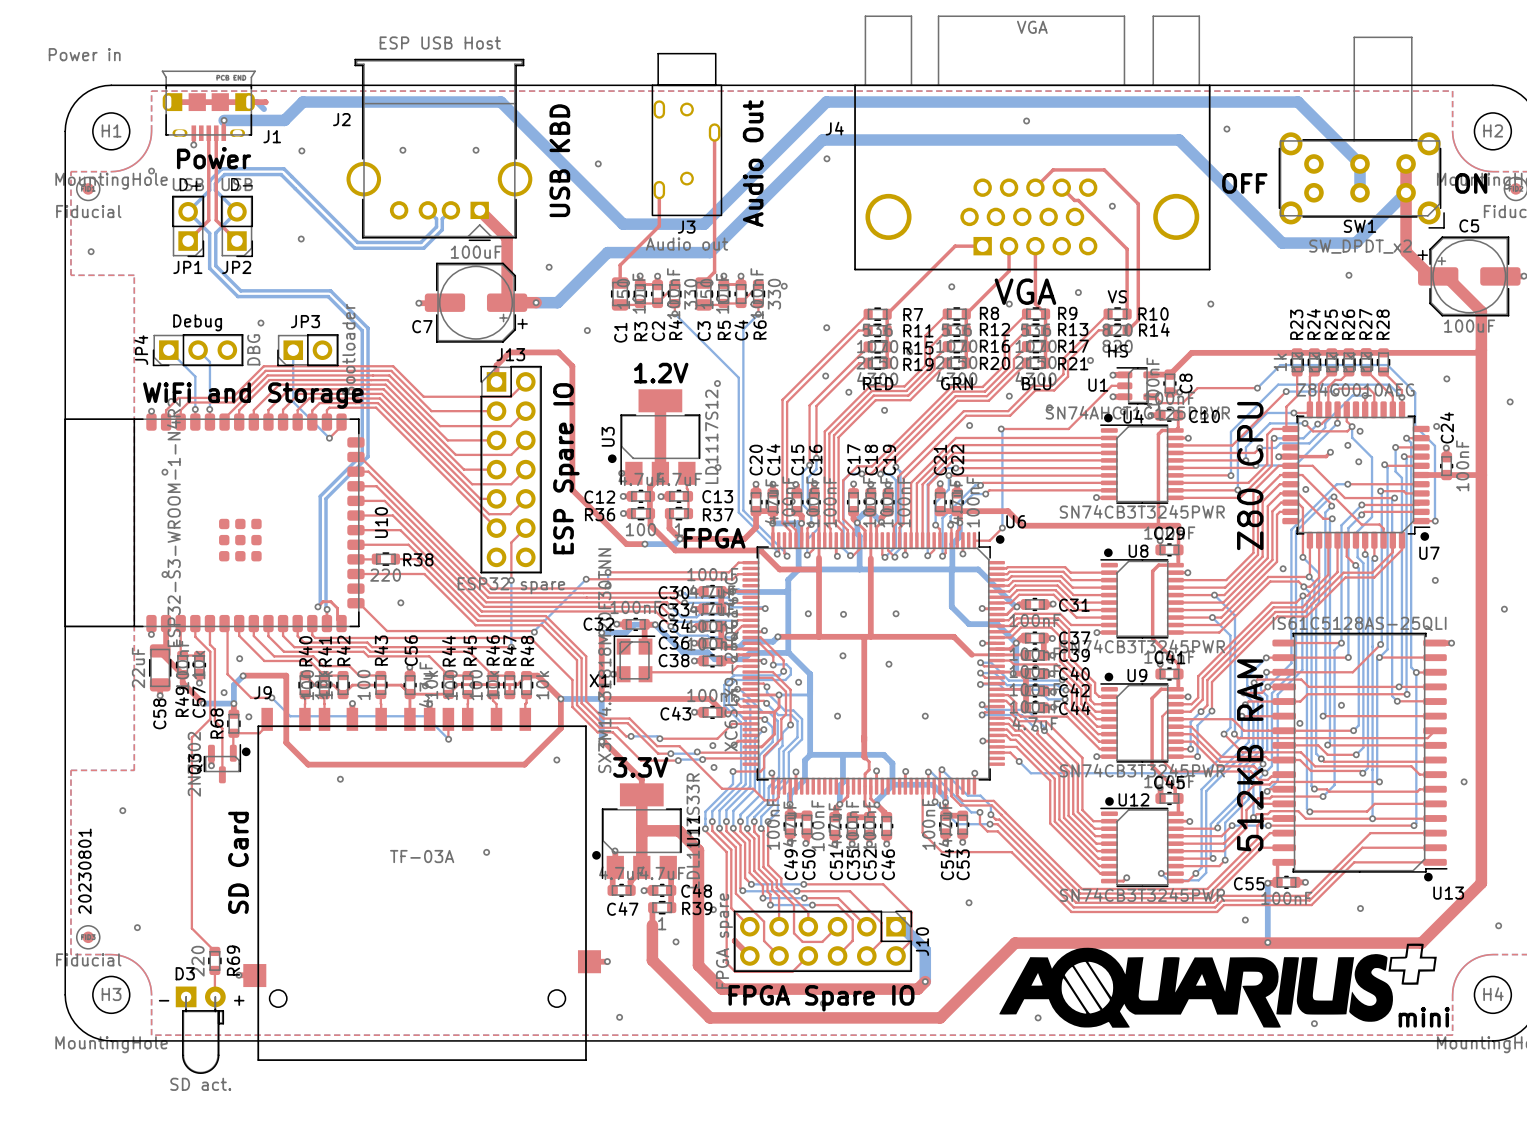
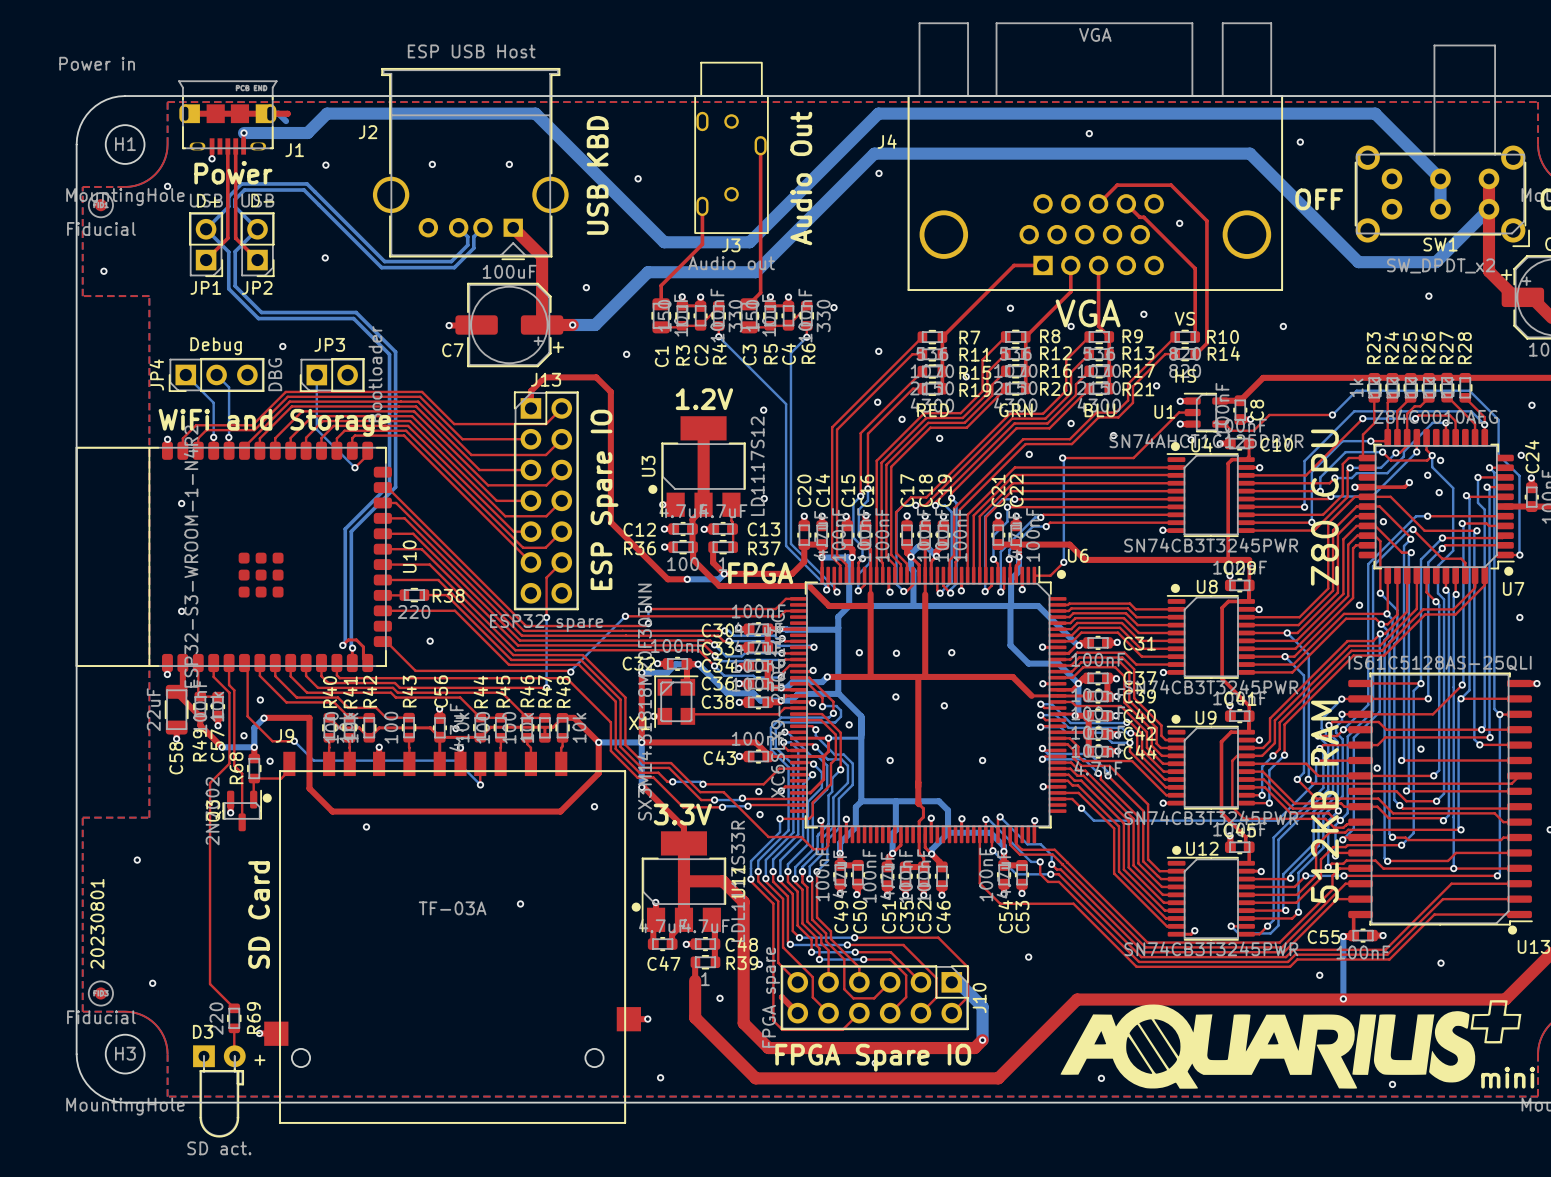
text: - (164, 1000) -> none

